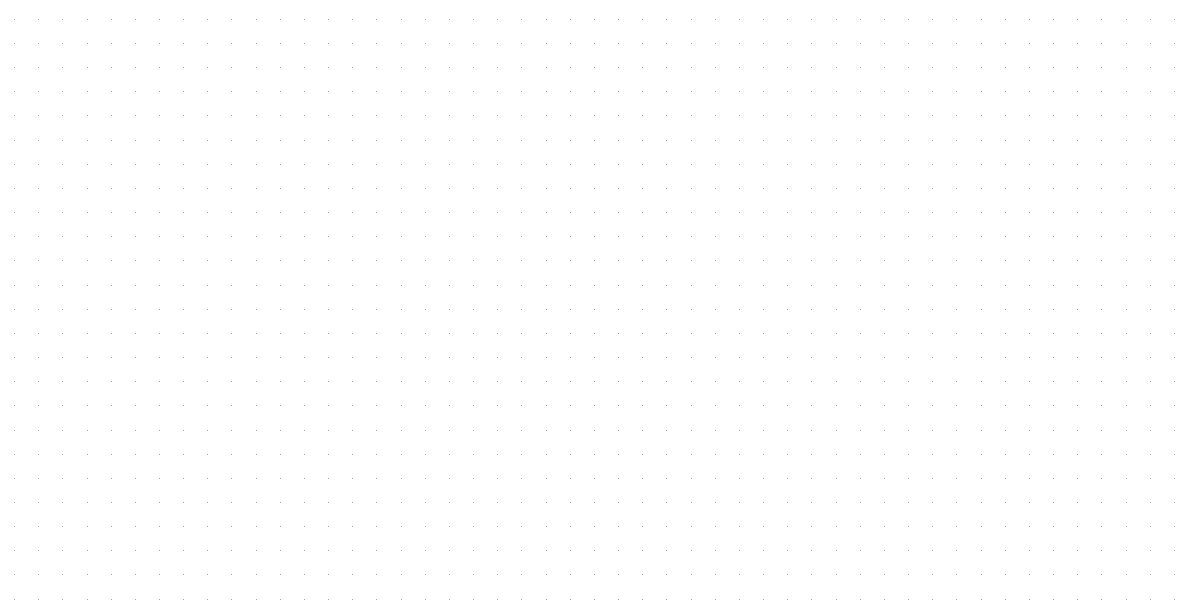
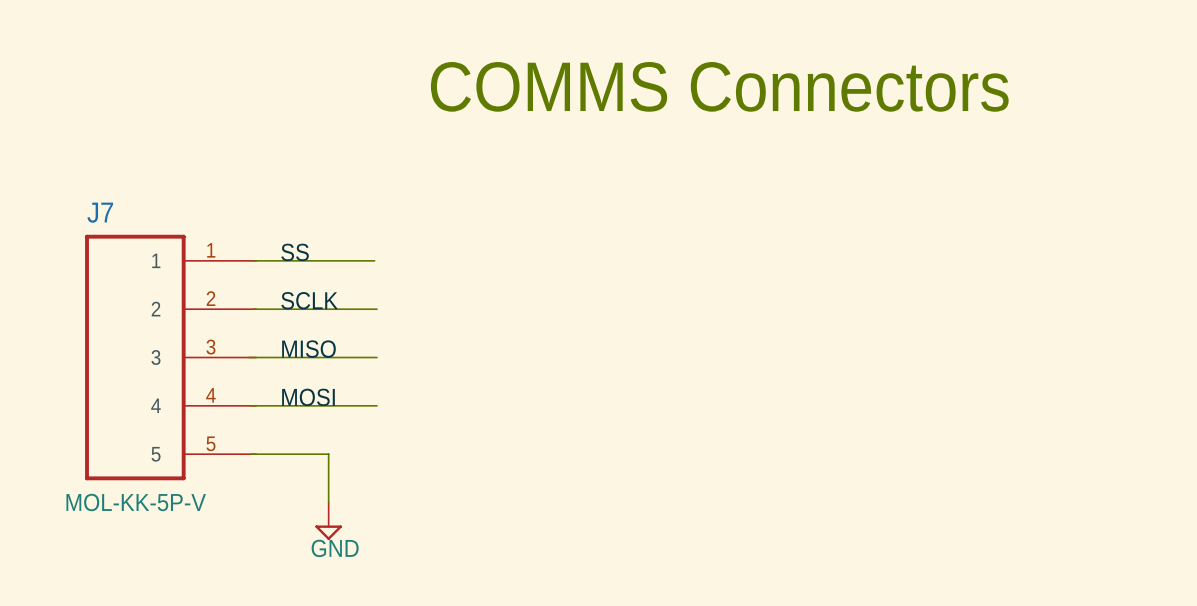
text: none -> COMMS Connectors (719, 86)
label: none -> SS (295, 252)
wire: none -> (253, 260) (374, 260)
label: none -> SCLK (309, 300)
wire: none -> (253, 309) (376, 309)
label: none -> MISO (308, 349)
J7: none -> MOL-KK-5P-V (170, 357)
wire: none -> (248, 357) (376, 357)
label: none -> MOSI (308, 397)
wire: none -> (251, 405) (376, 405)
wire: none -> (251, 454) (328, 454) (328, 502)
power symbol: none -> GND (328, 521)

